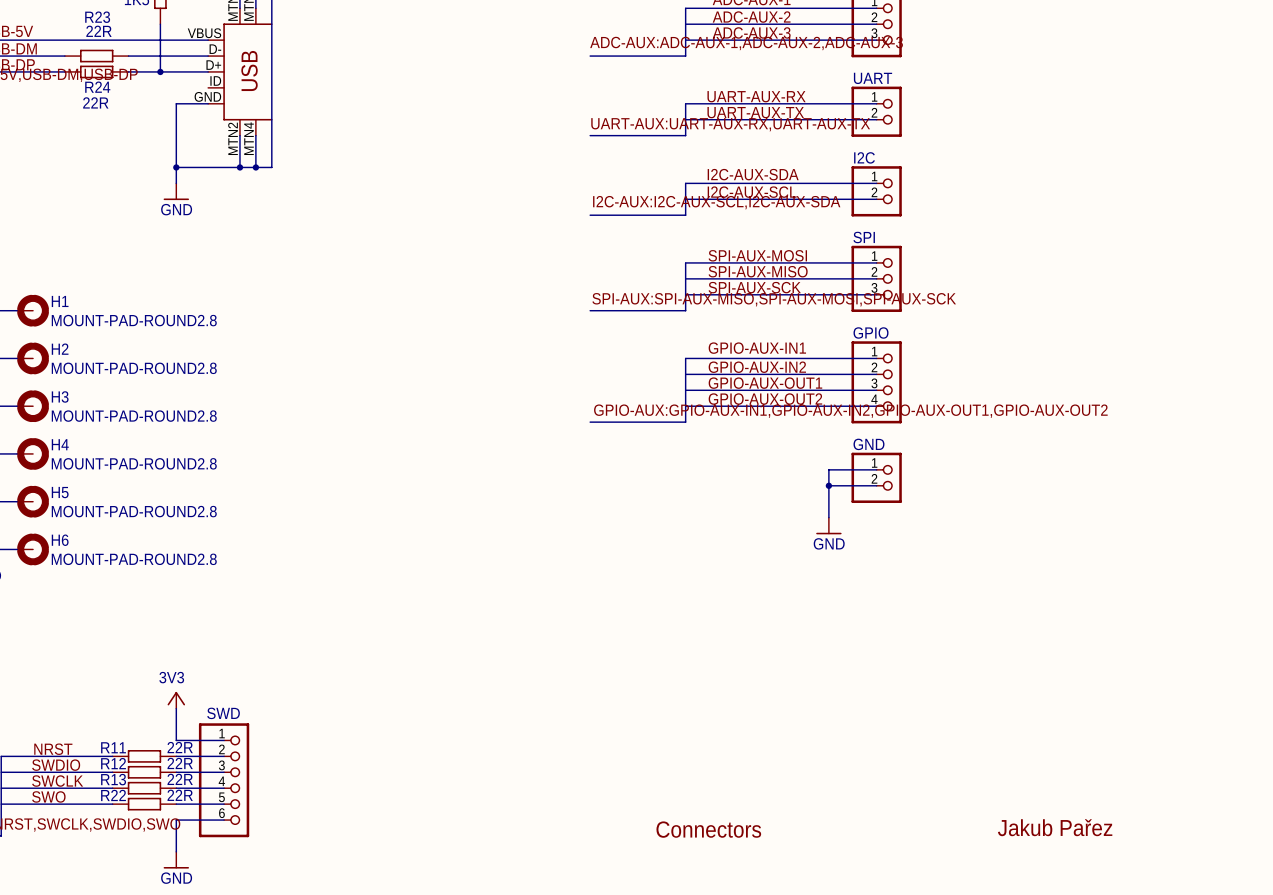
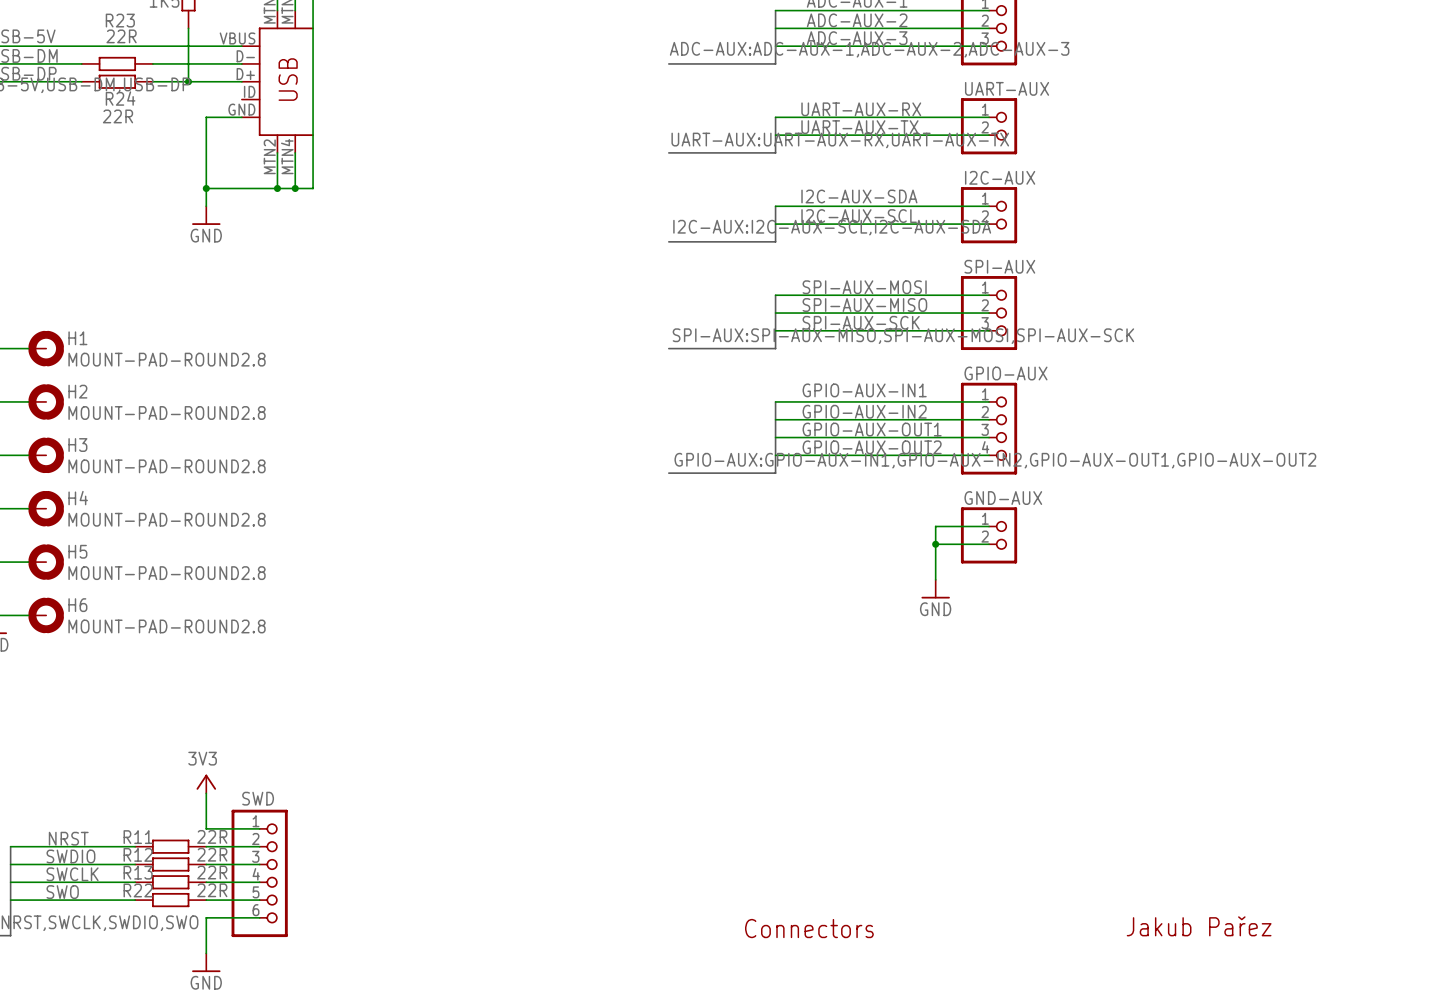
UART name: UART (873, 78) -> UART-AUX (1007, 88)
I2C name: I2C (864, 157) -> I2C-AUX (1000, 177)
SPI name: SPI (864, 237) -> SPI-AUX (999, 266)
GPIO name: GPIO (871, 332) -> GPIO-AUX (1005, 373)
GND name: GND (868, 444) -> GND-AUX (1003, 498)

